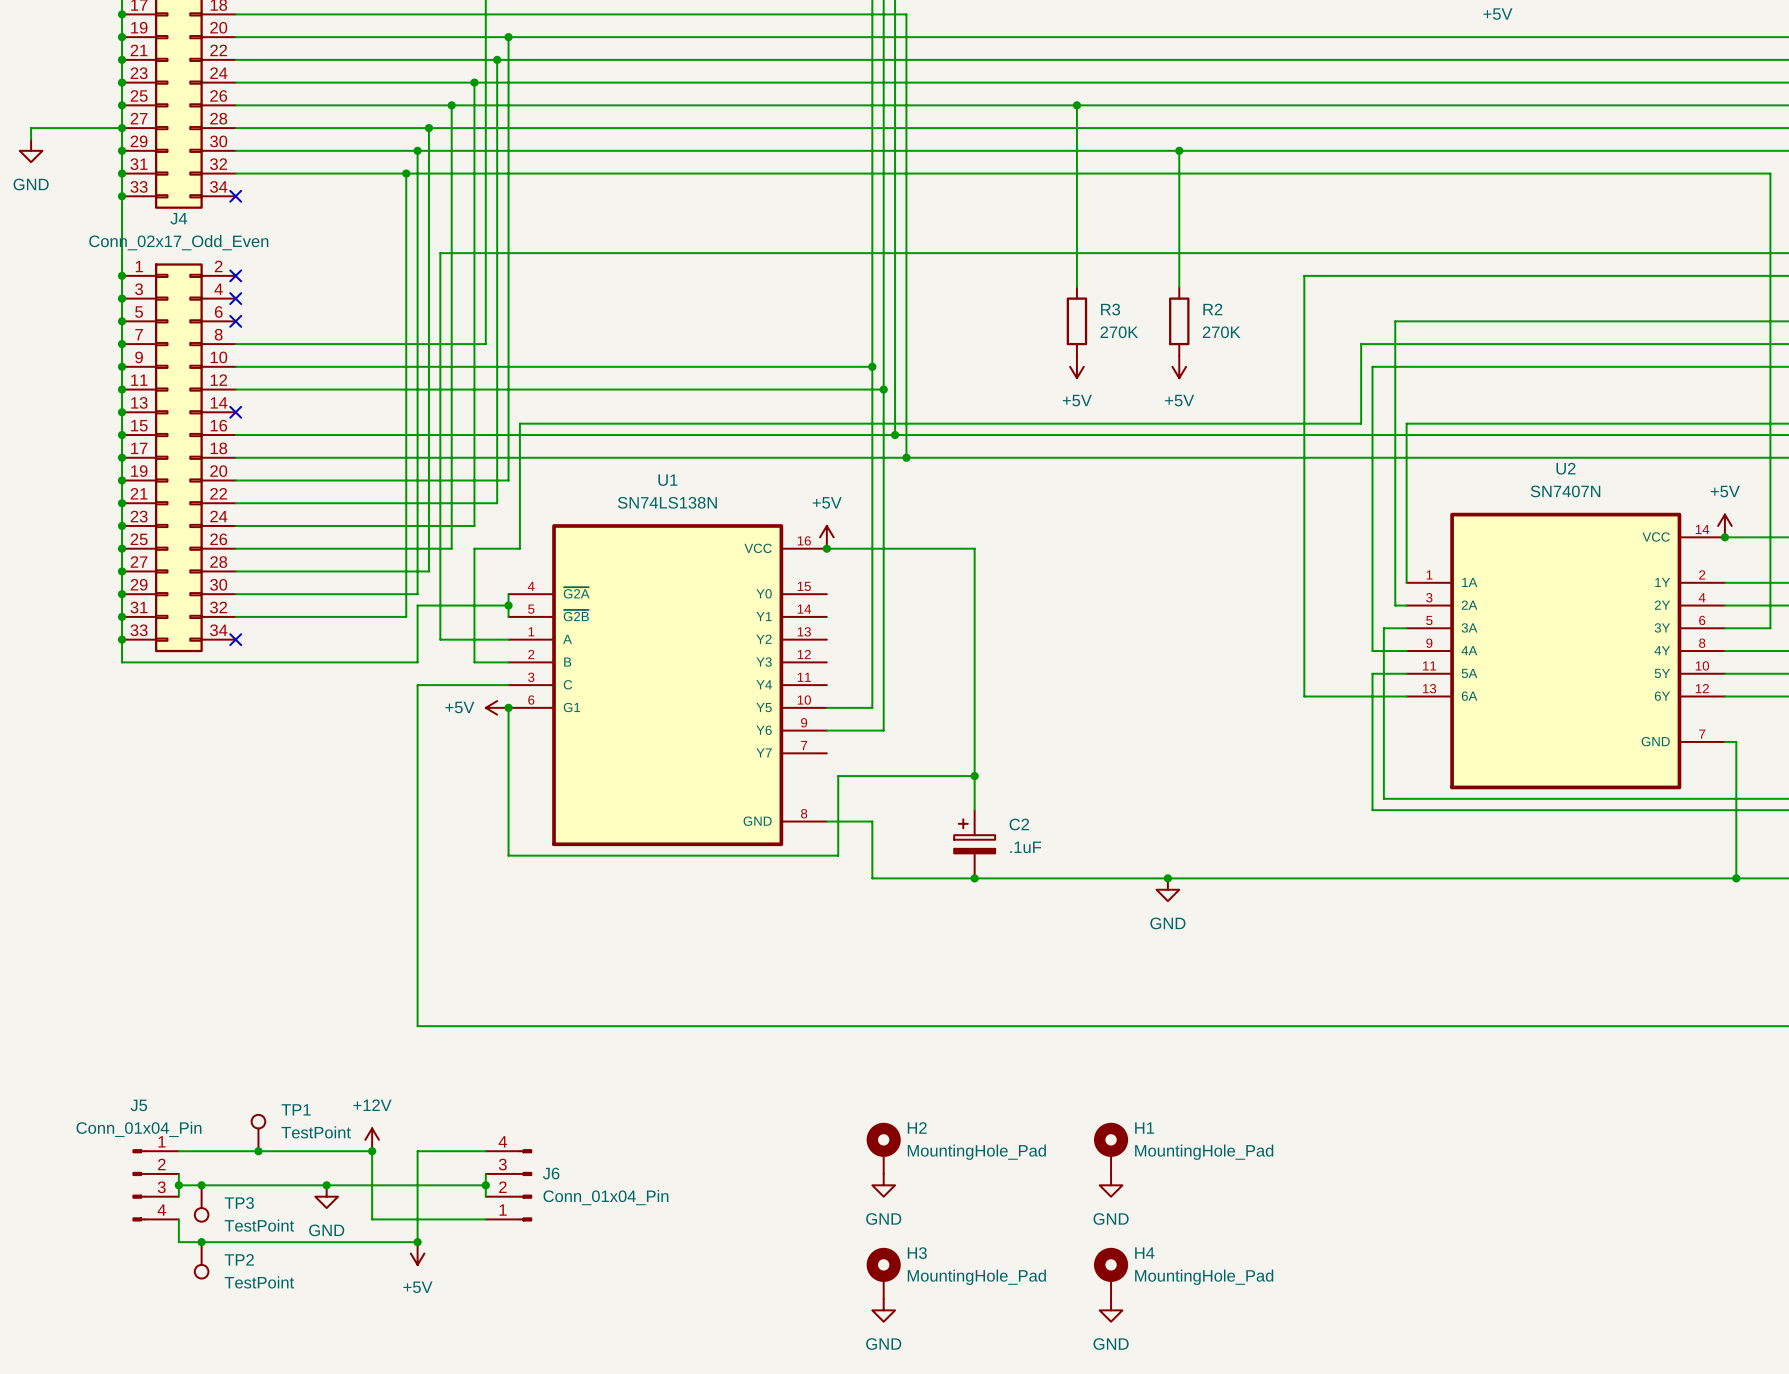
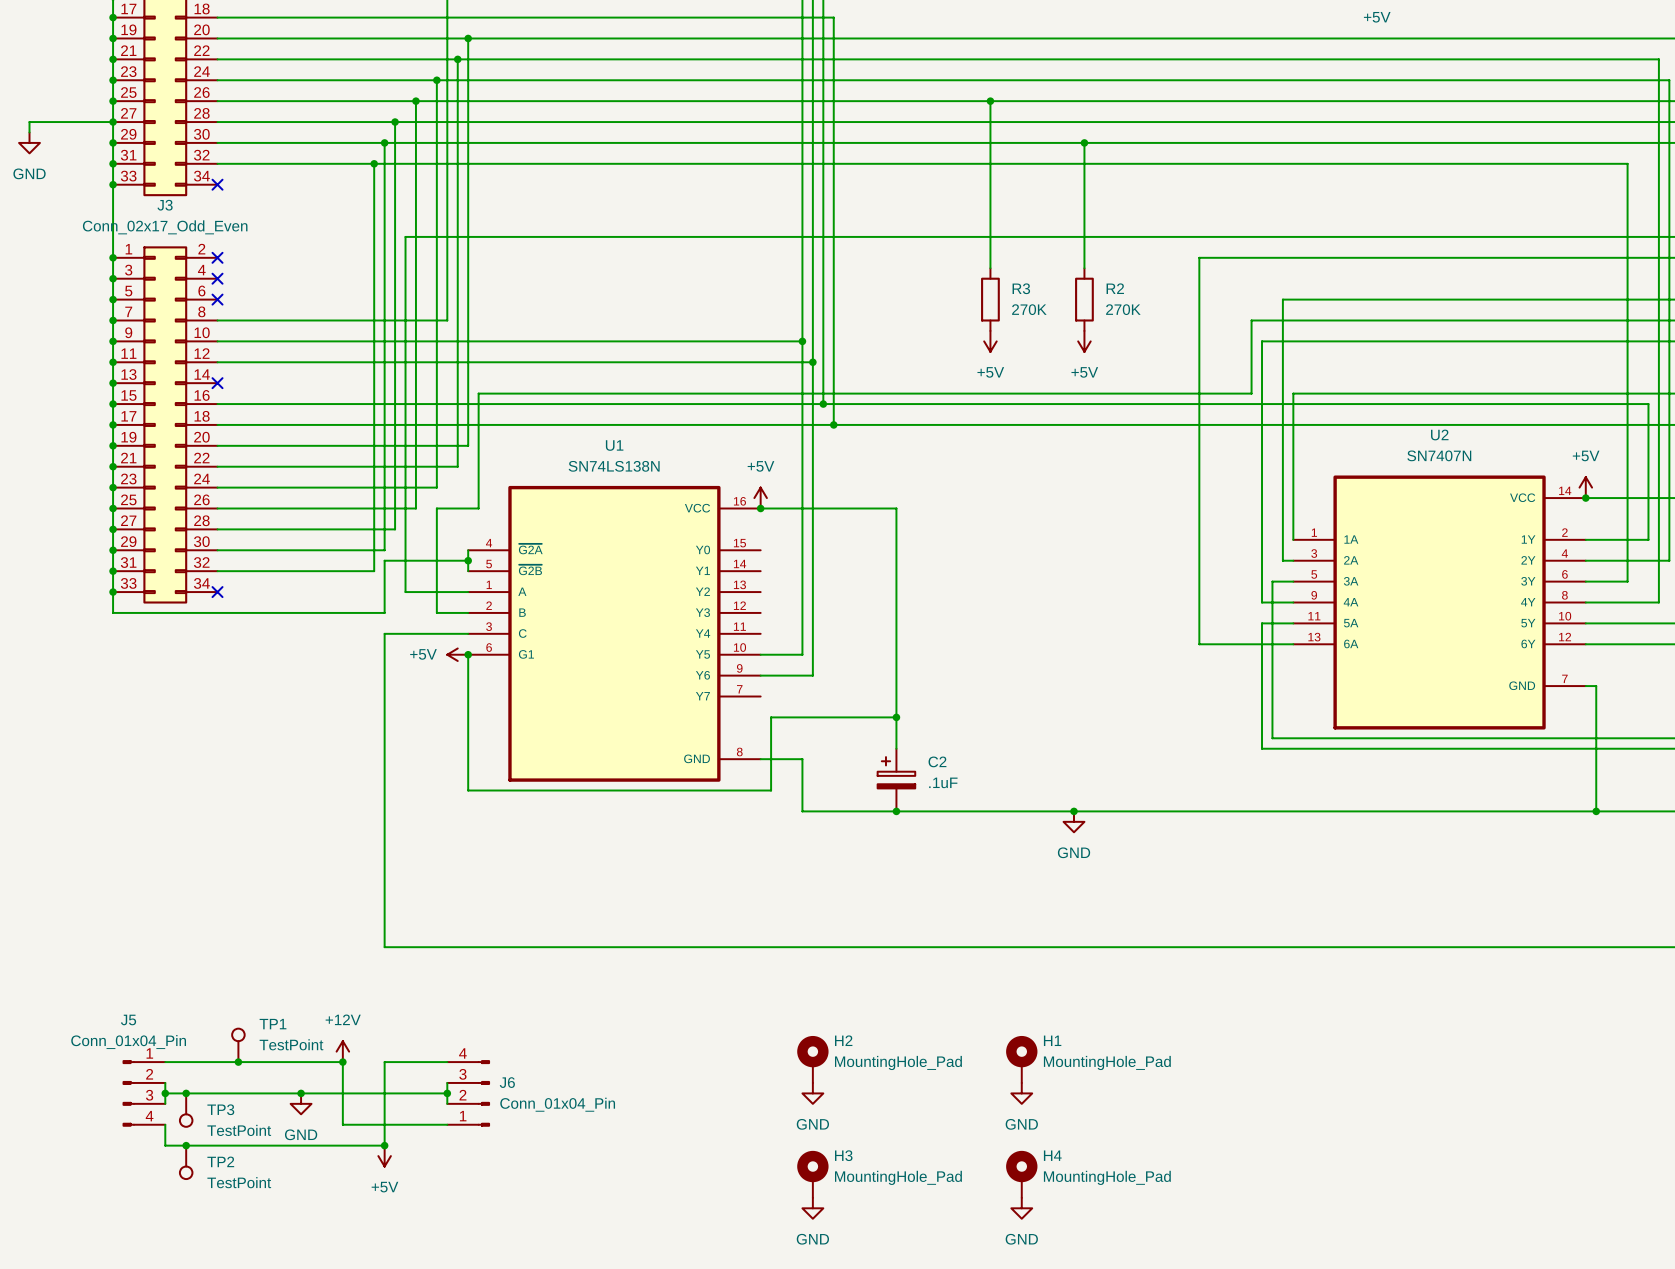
J4 name: J4 (178, 218) -> J3 (165, 205)

